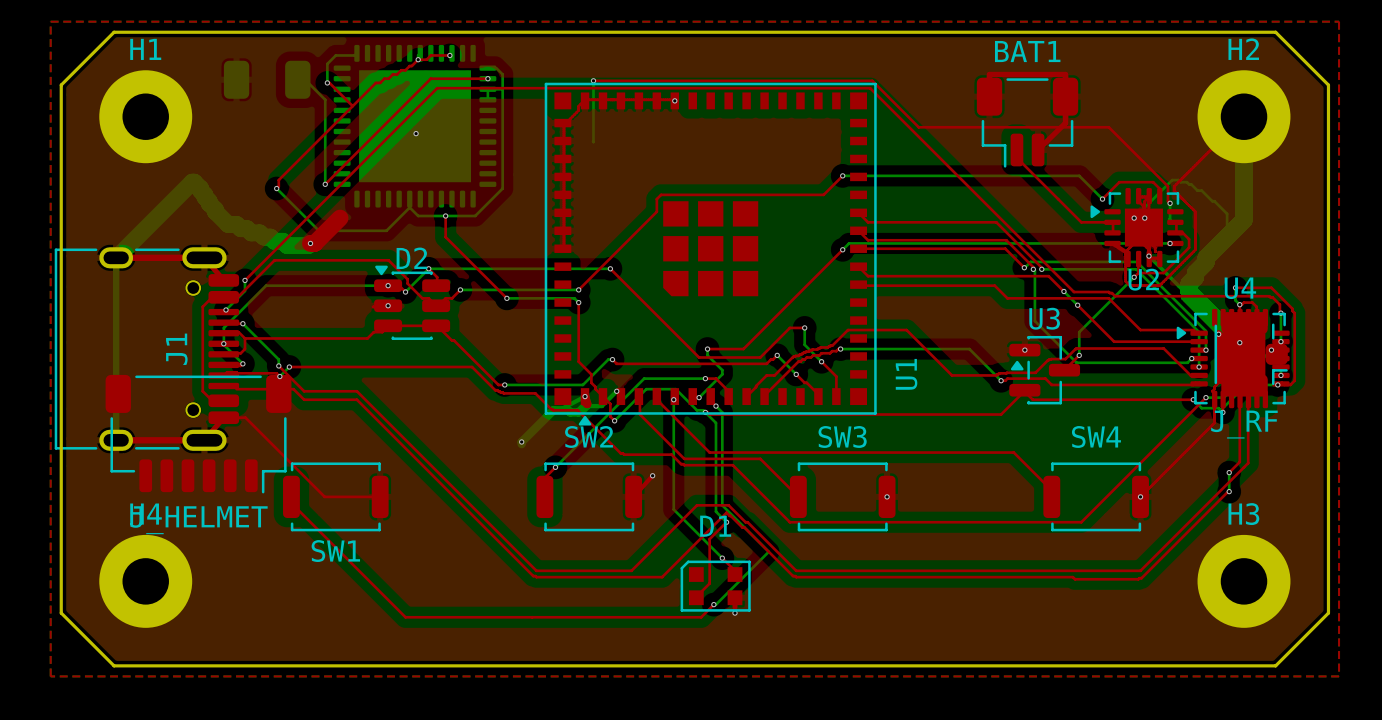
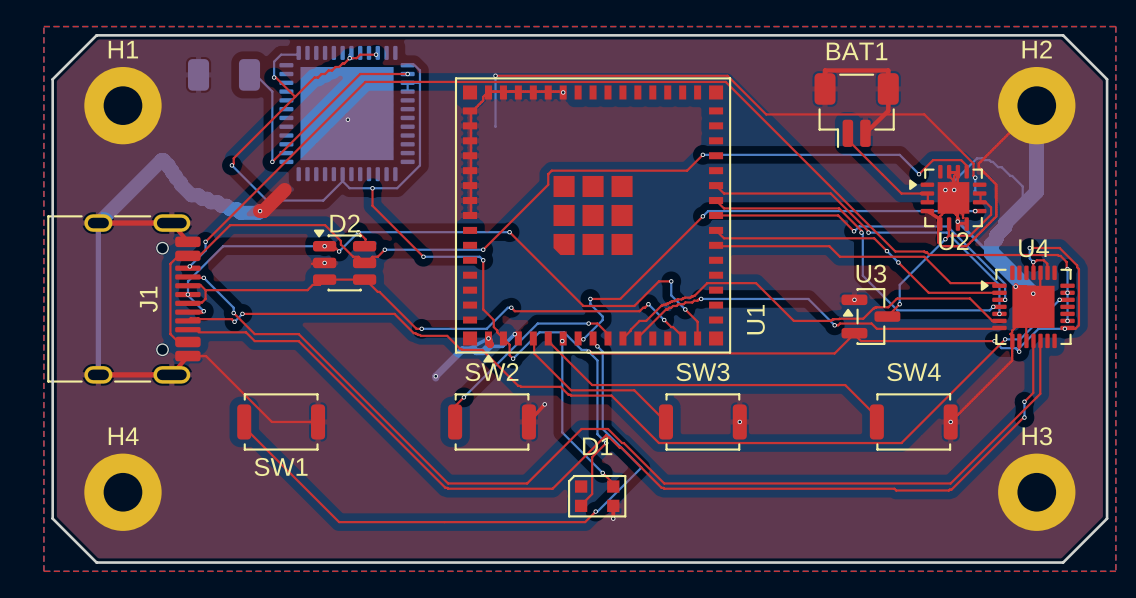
J_RF: (1251, 354) -> none
J_HELMET: (198, 434) -> none

